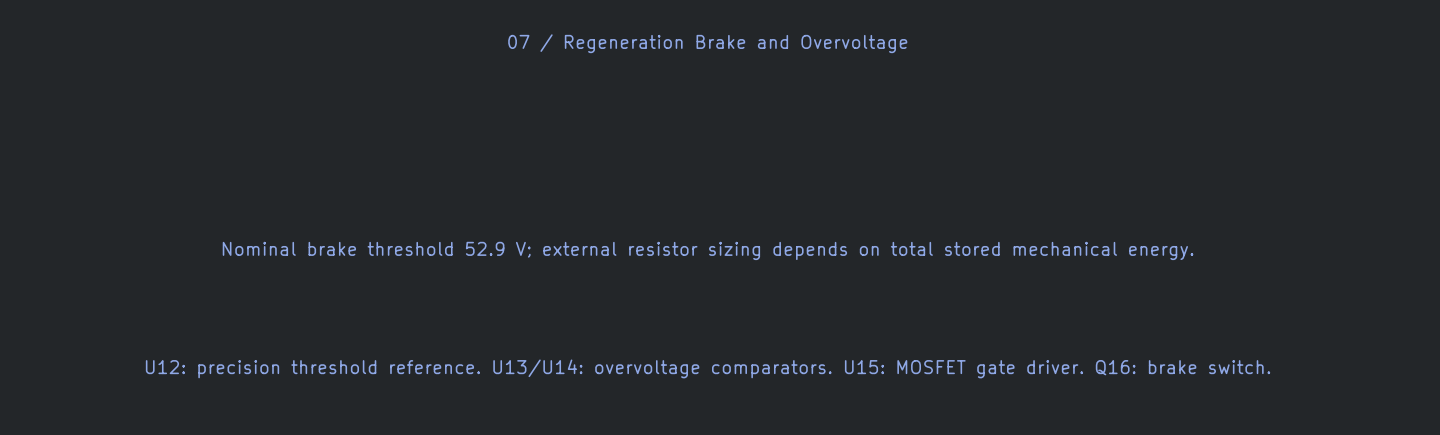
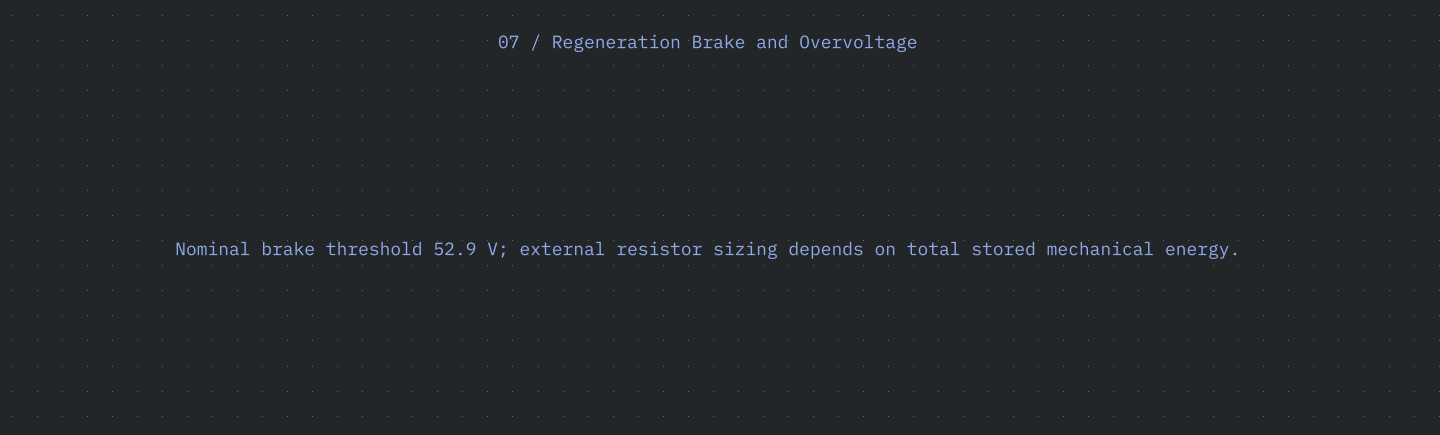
text: U12: precision threshold reference. U13/U14: overvoltage comparators. U15: MOSFET gate driver. Q16: brake switch. (708, 368) -> none

